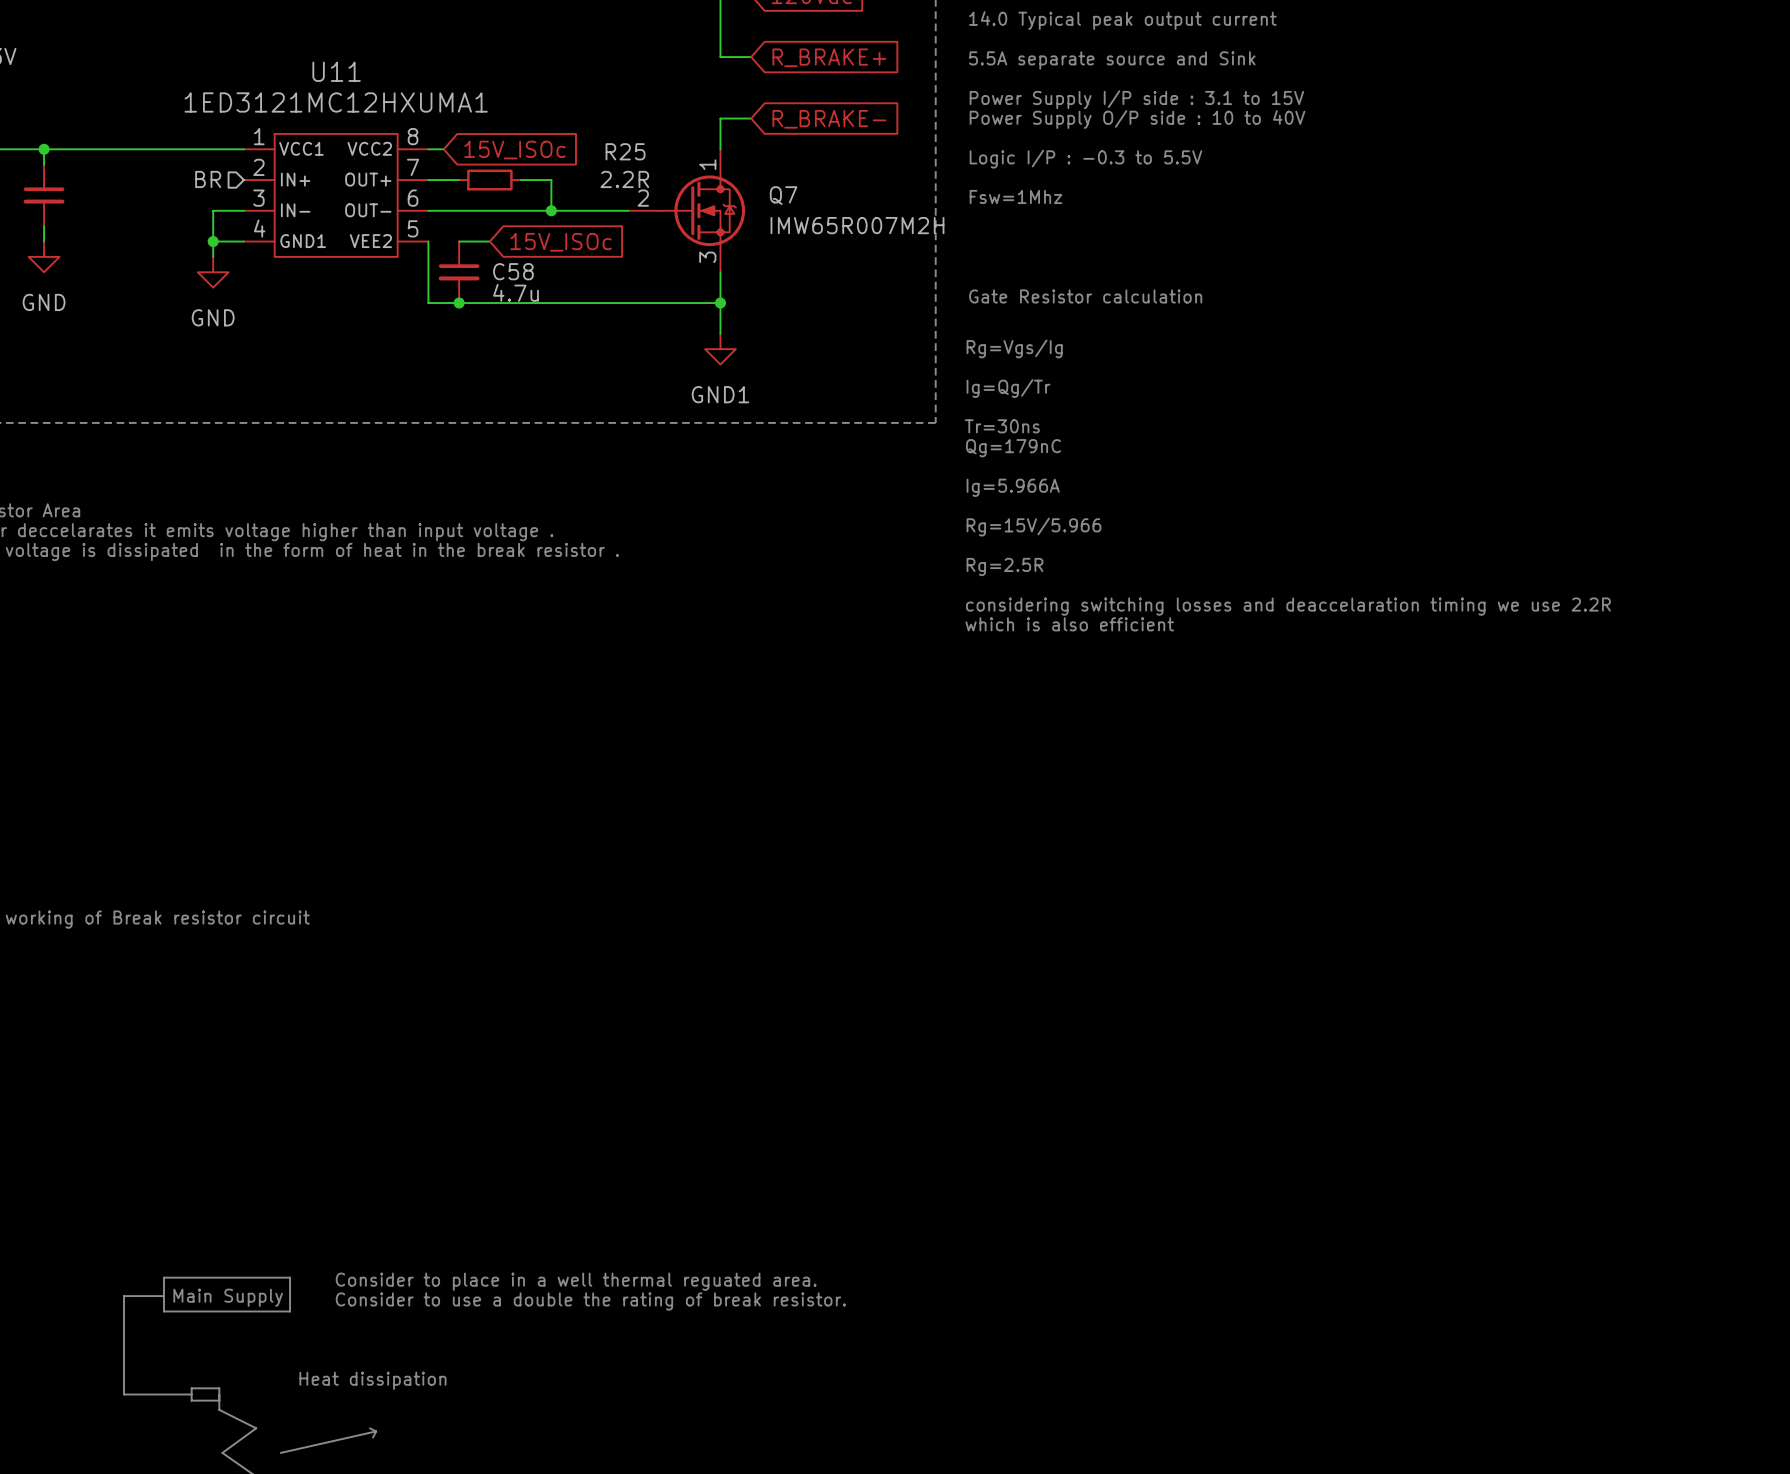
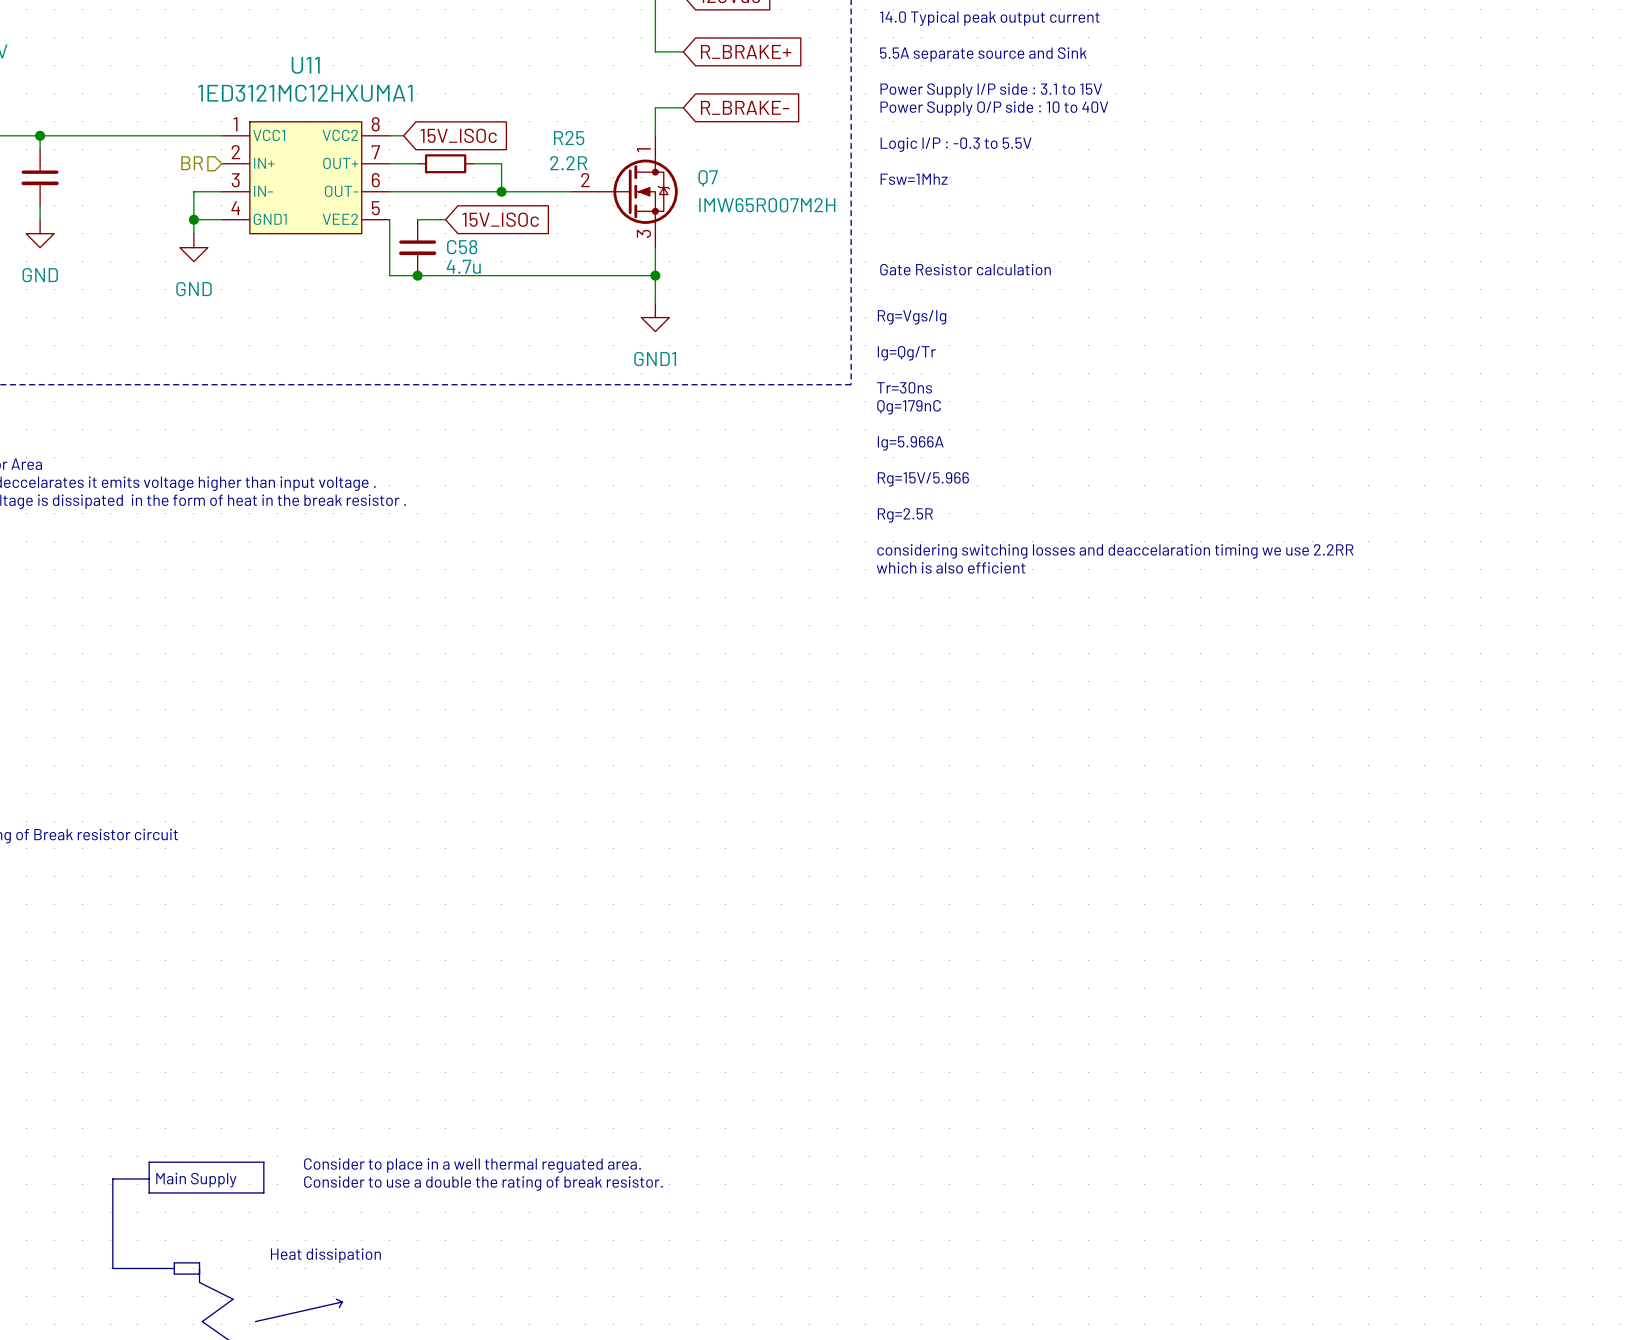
text: considering switching losses and deaccelaration timing we use 2.2R (1288, 606) -> considering switching losses and deaccelaration timing we use 2.2RR (1115, 551)

